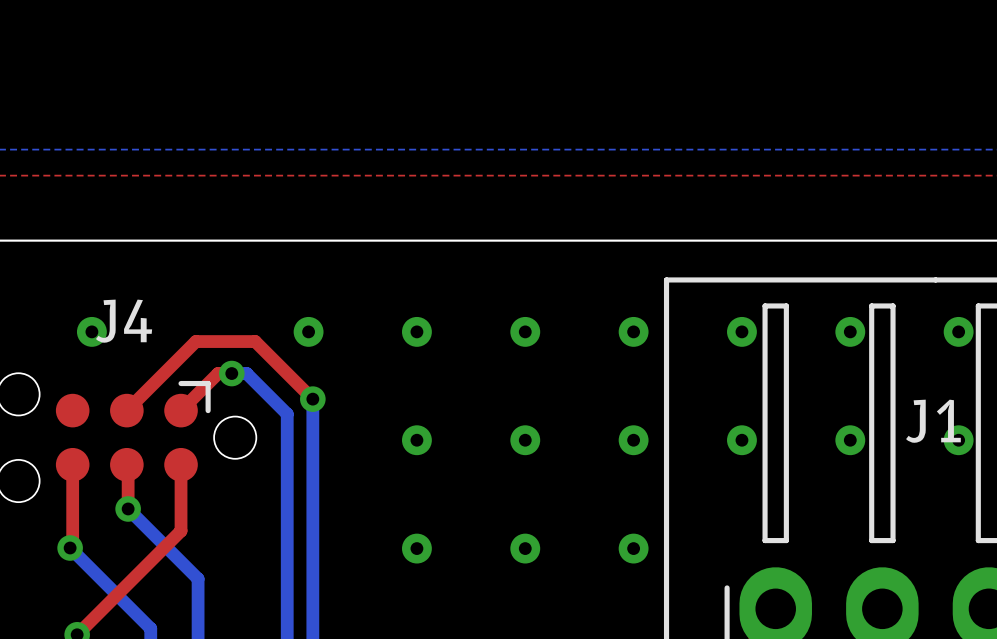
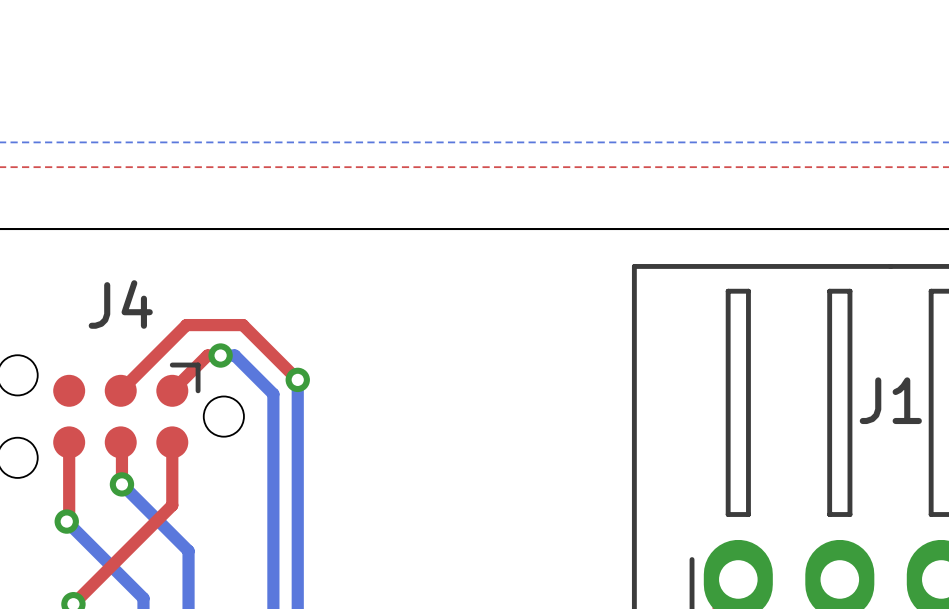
via: (91, 331) -> none
via: (308, 331) -> none
via: (416, 331) -> none
via: (525, 331) -> none
via: (633, 331) -> none
via: (741, 331) -> none
via: (850, 331) -> none
via: (958, 331) -> none
via: (416, 440) -> none
via: (525, 440) -> none
via: (633, 440) -> none
via: (741, 440) -> none
via: (850, 440) -> none
via: (958, 440) -> none
via: (416, 548) -> none
via: (525, 548) -> none
via: (633, 548) -> none

